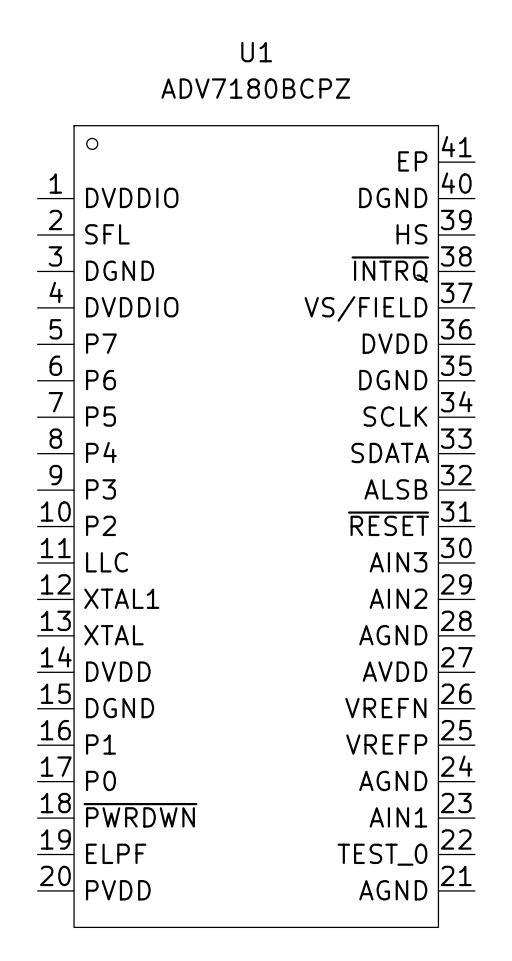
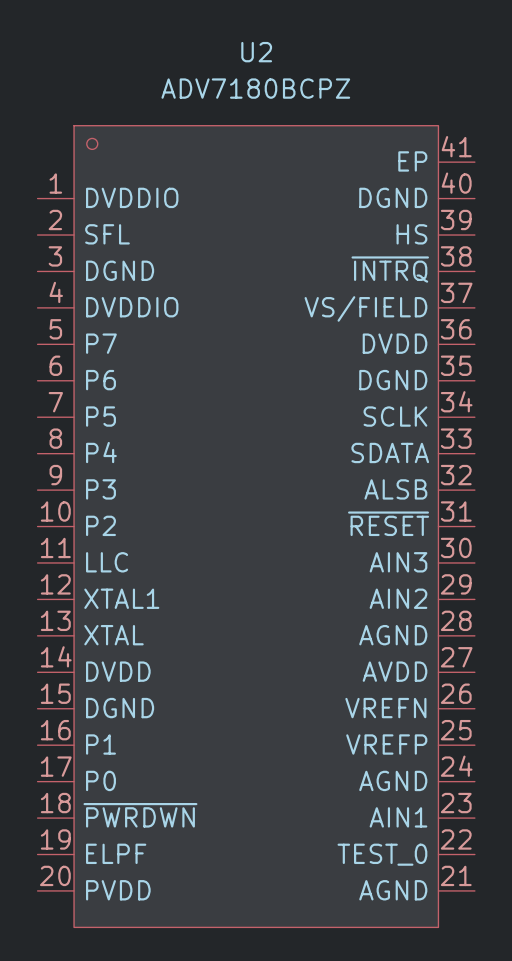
U1 name: U1 (256, 52) -> U2 (256, 52)

